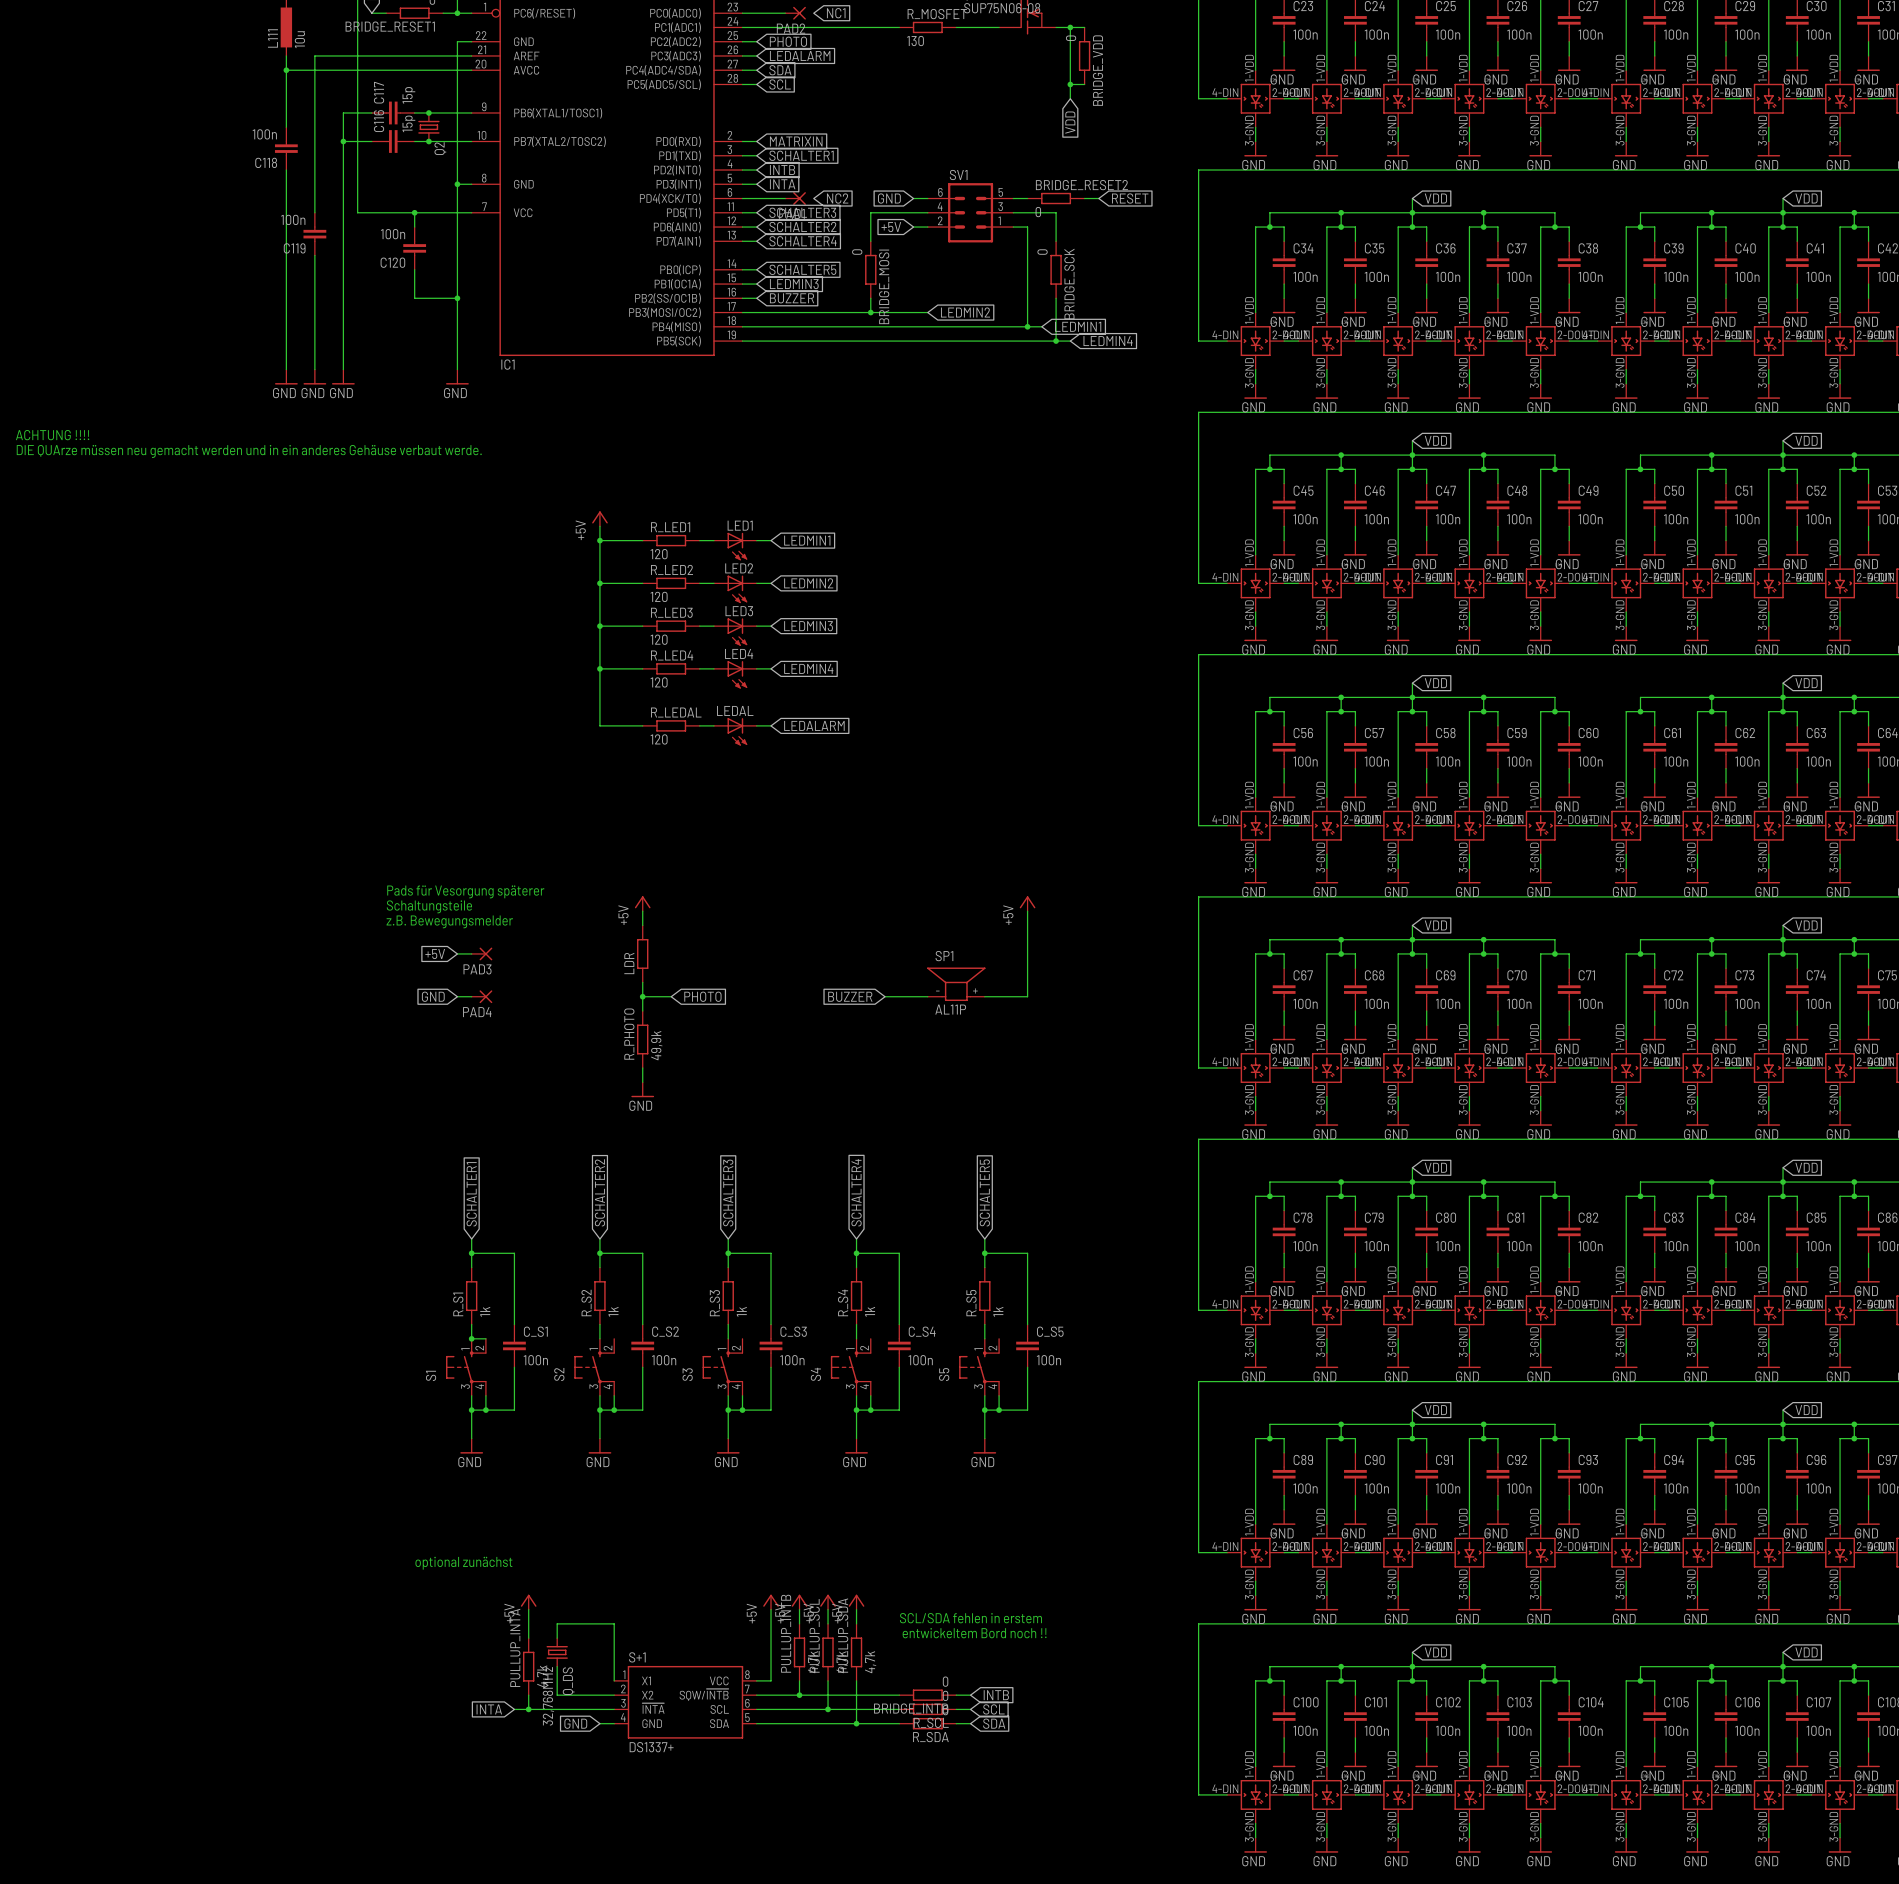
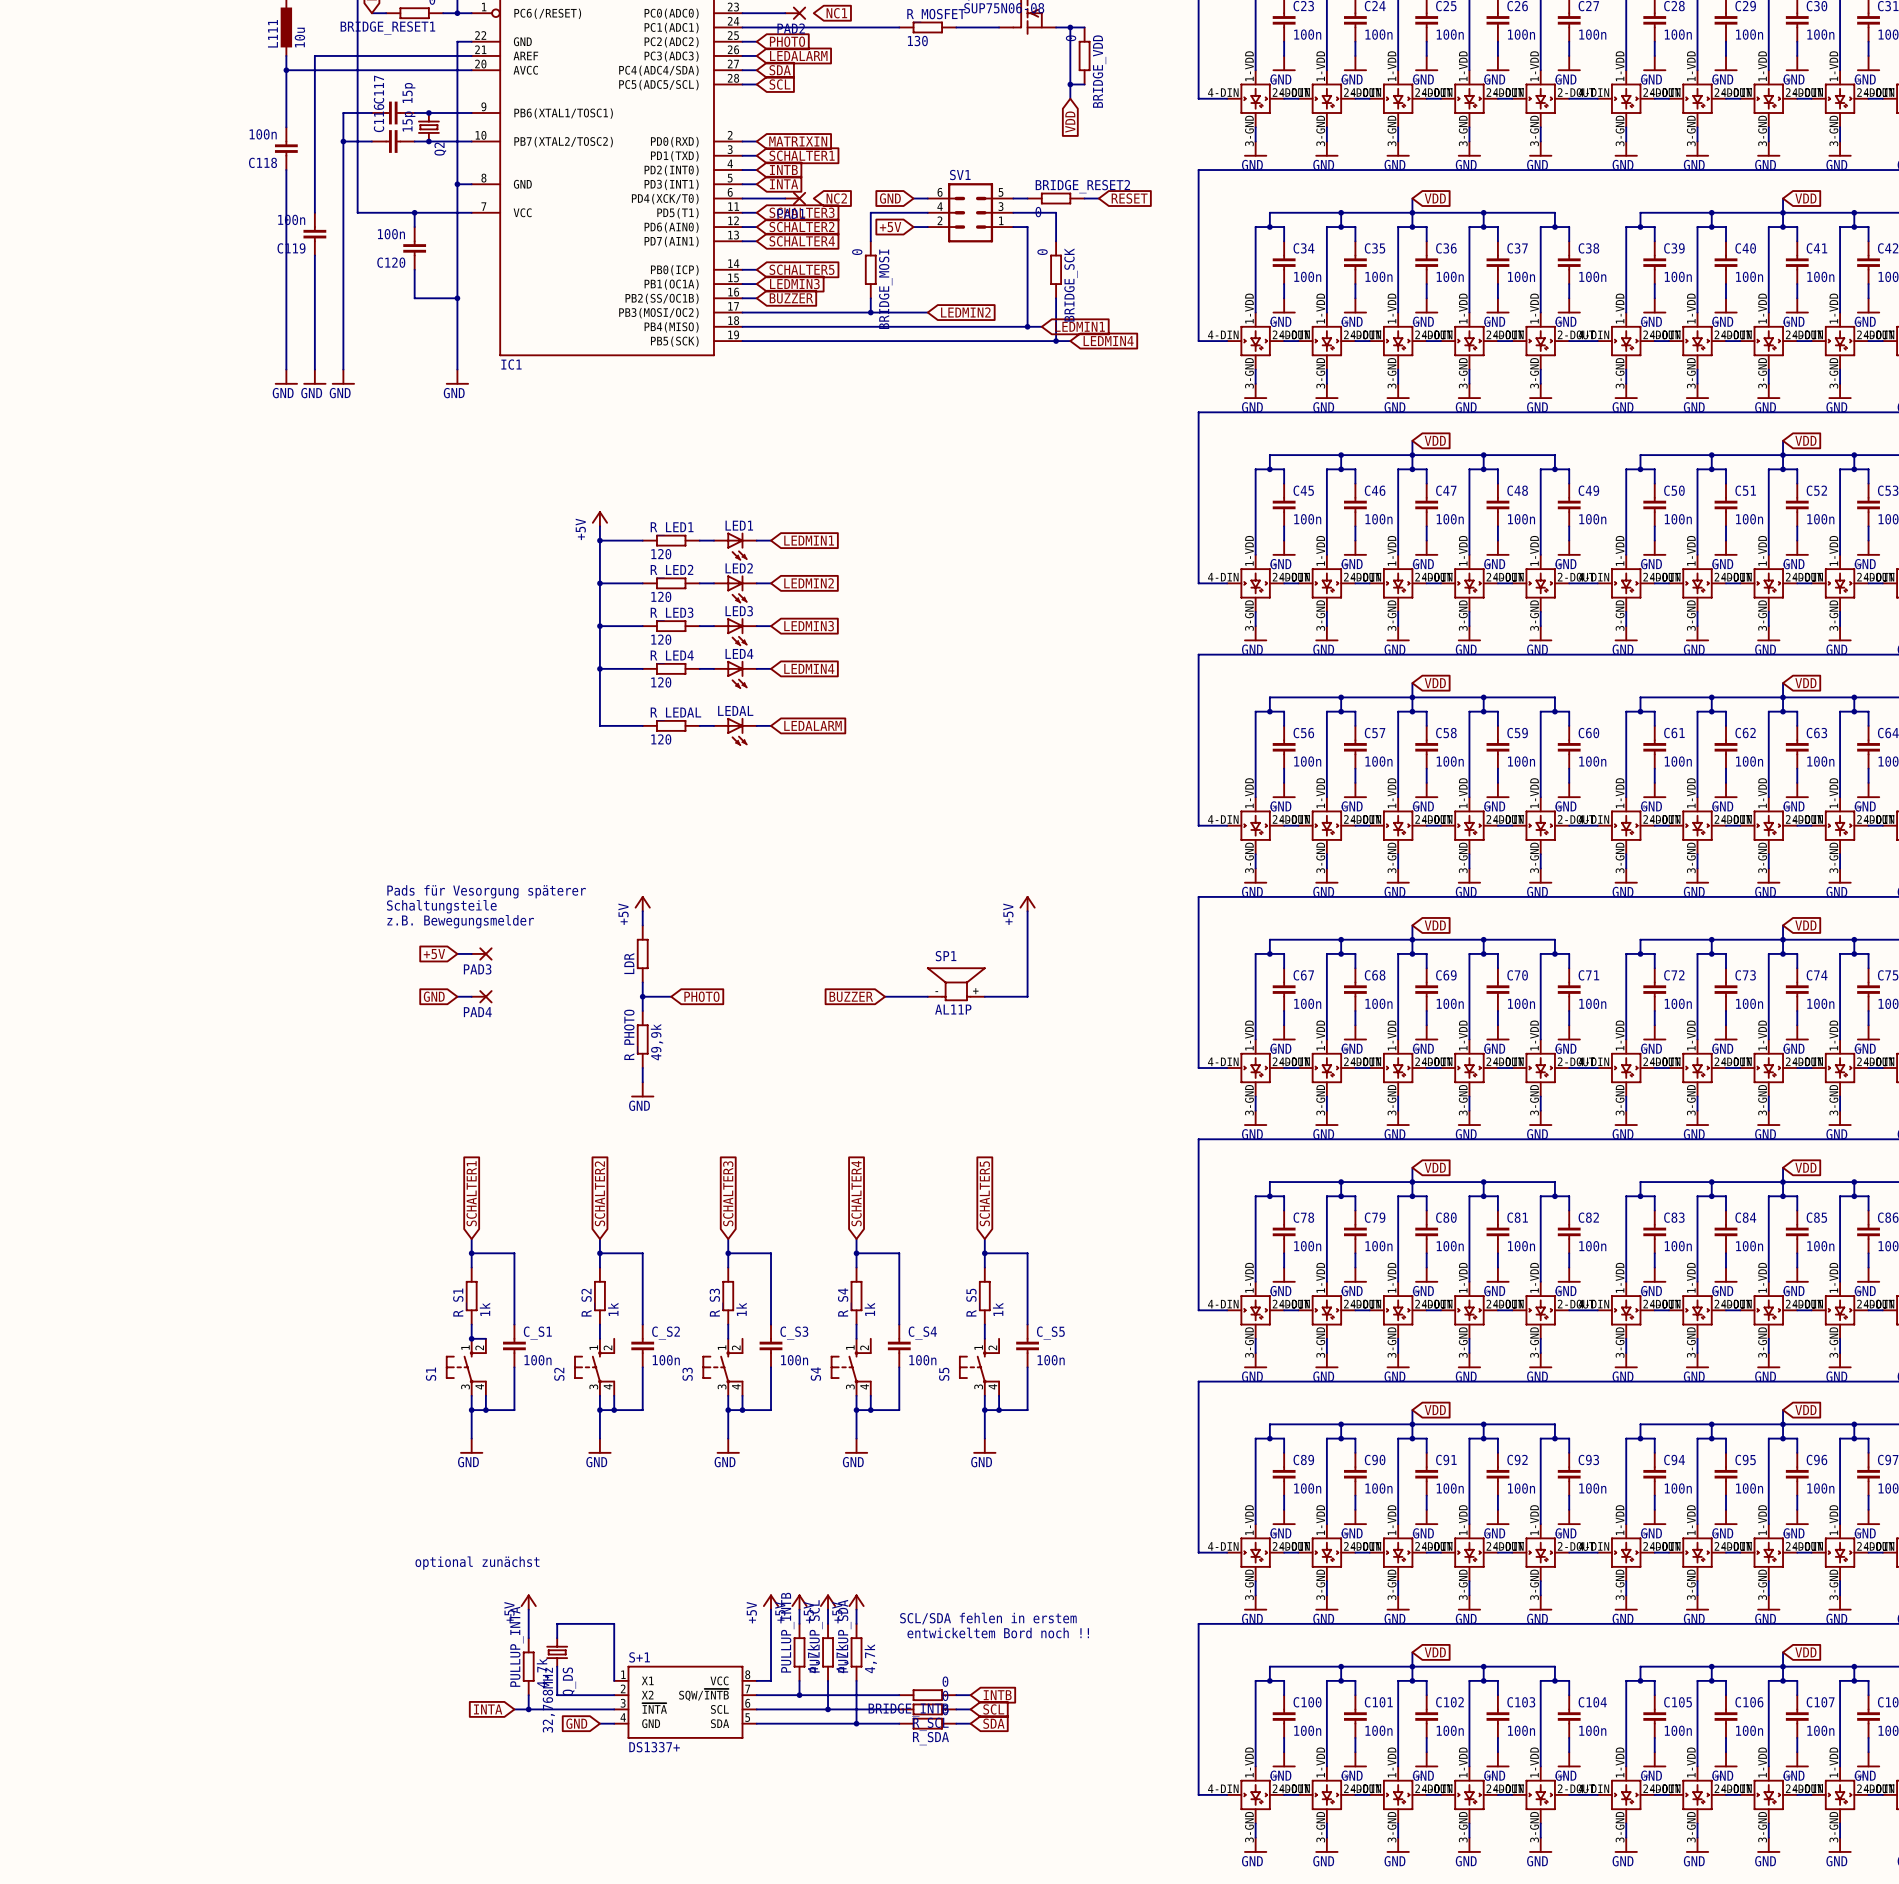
text: ACHTUNG !!!! (52, 435) -> none
text: DIE QUArze müssen neu gemacht werden und in ein anderes Gehäuse verbaut werde. (249, 451) -> none

